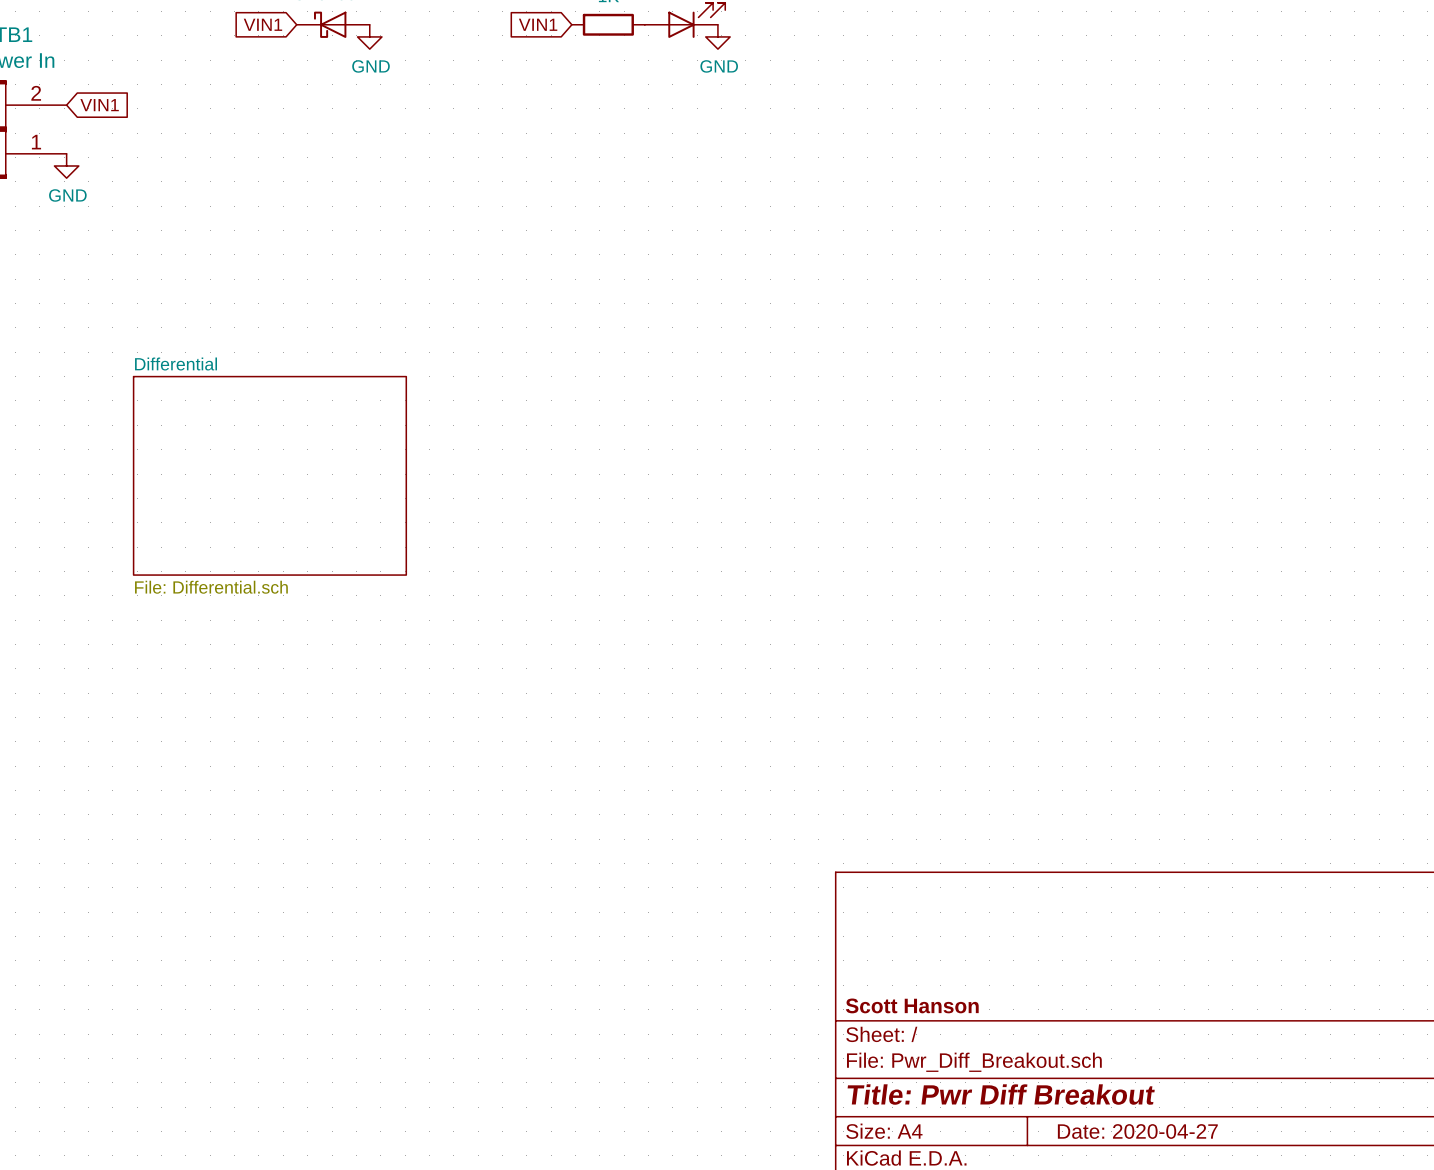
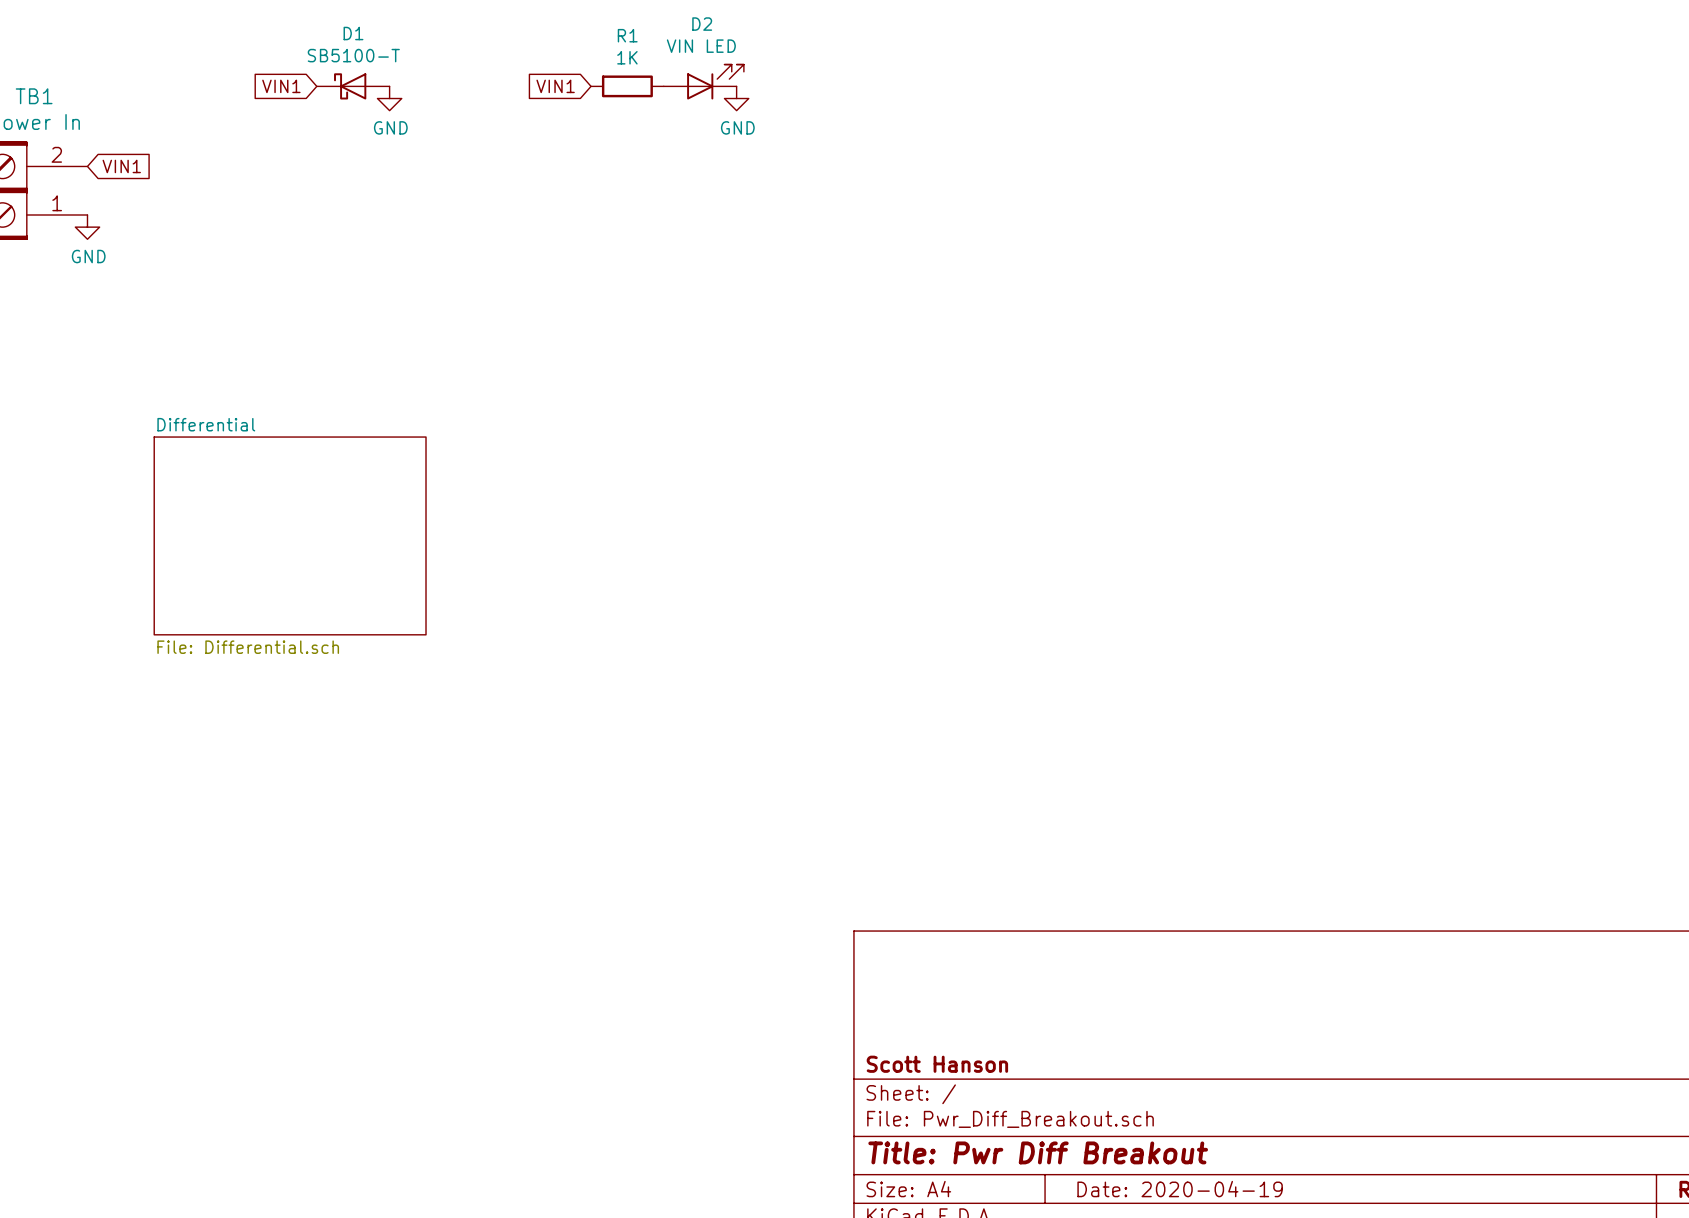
title block: Date: 2020-04-27 (1137, 1131) -> Date: 2020-04-19 (1180, 1189)

